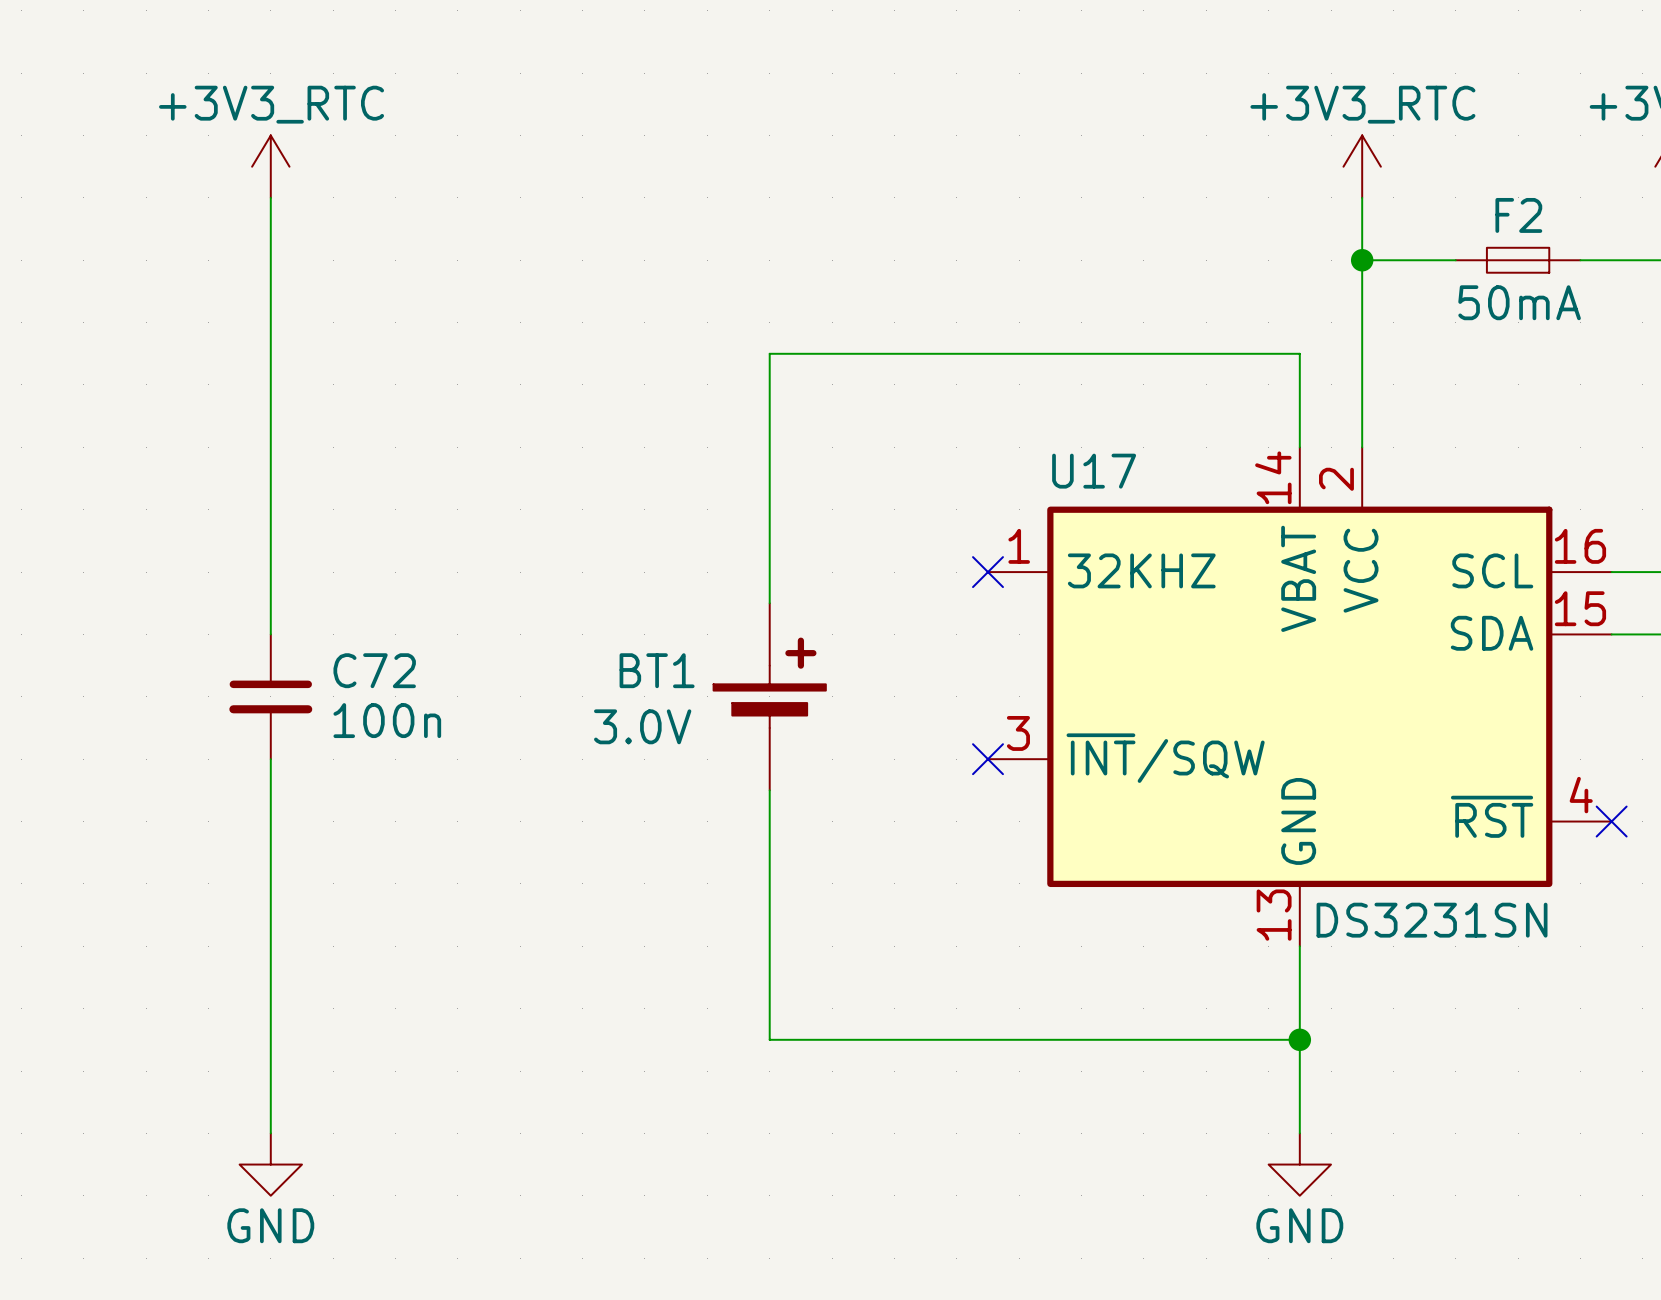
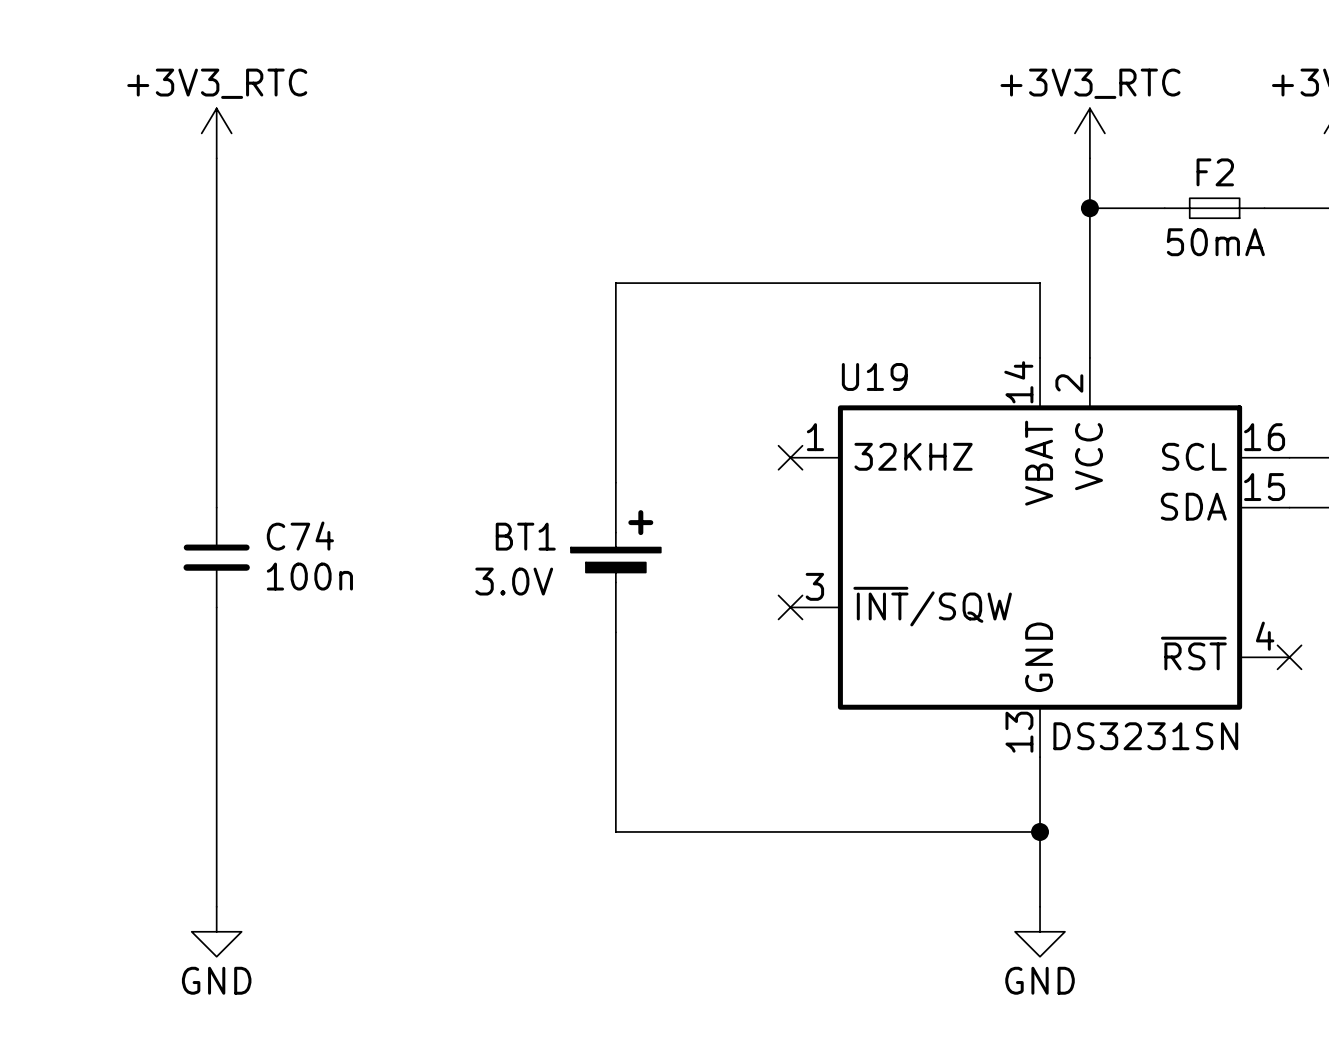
U17 name: U17 (1094, 471) -> U19 (874, 376)
C72 name: C72 (374, 670) -> C74 (300, 536)

